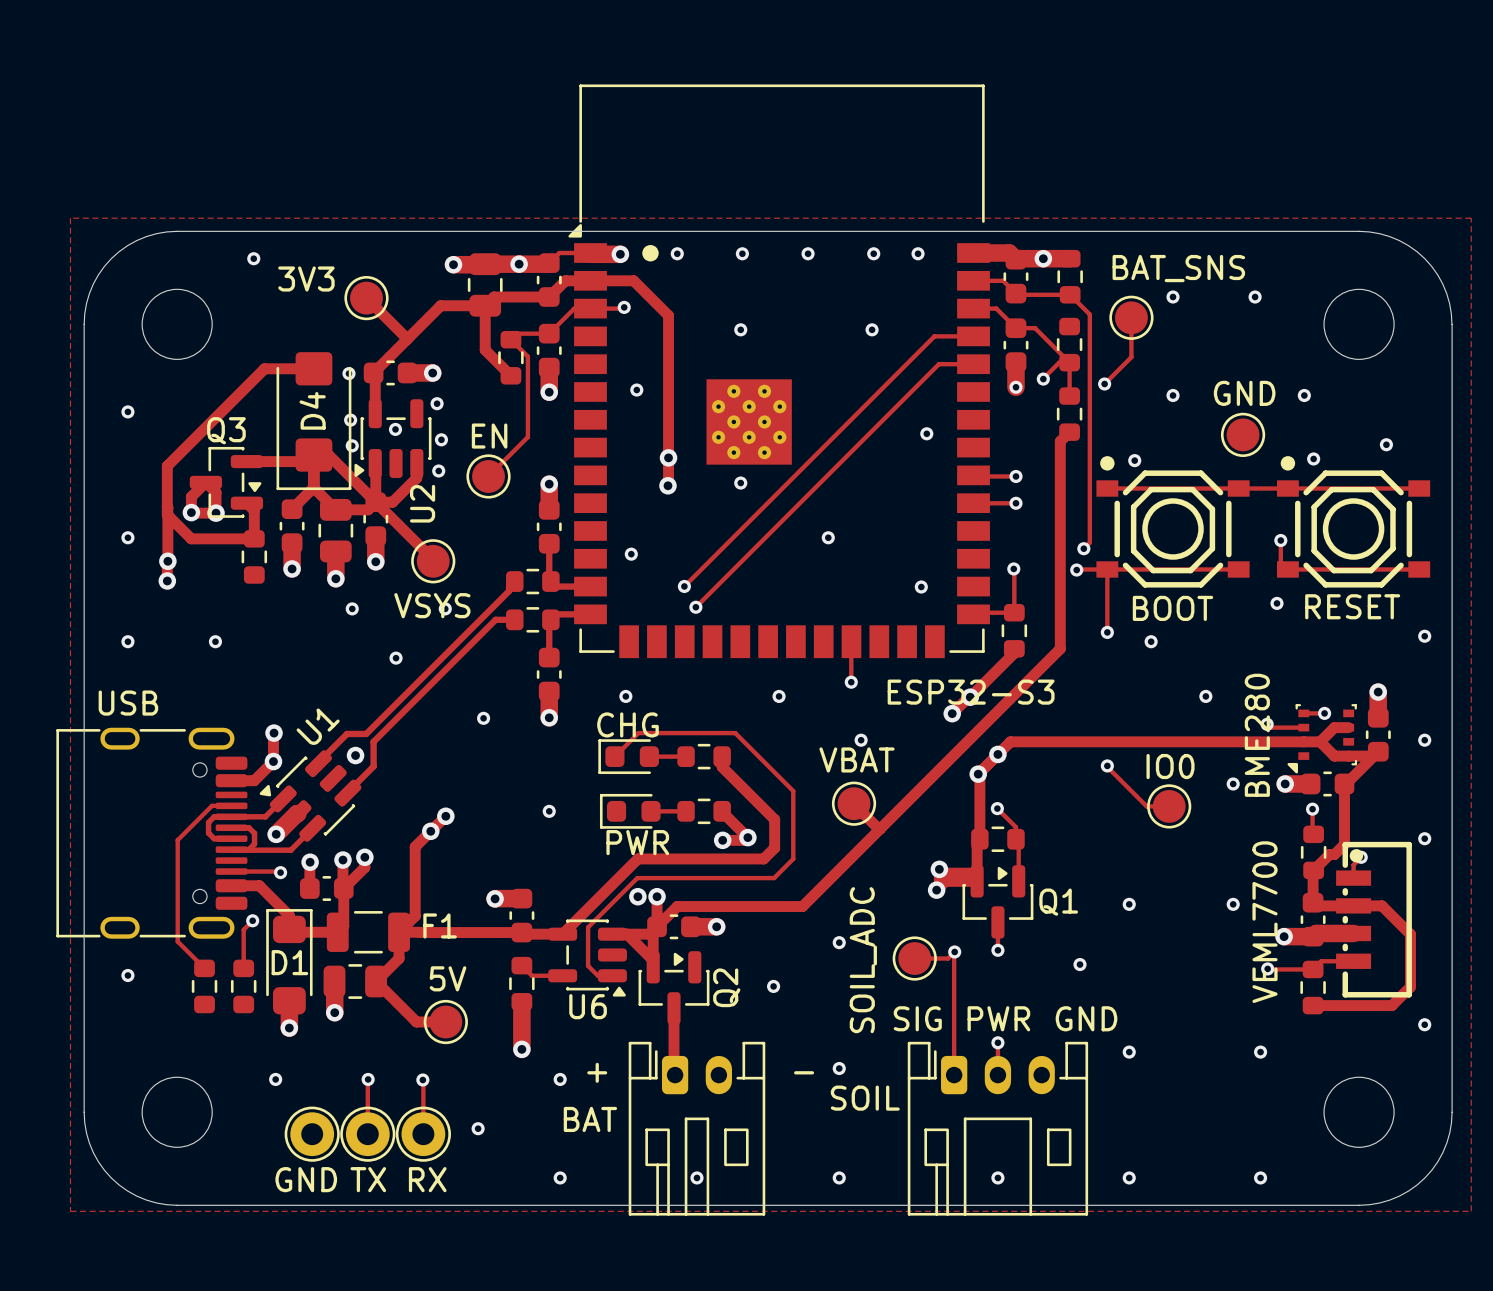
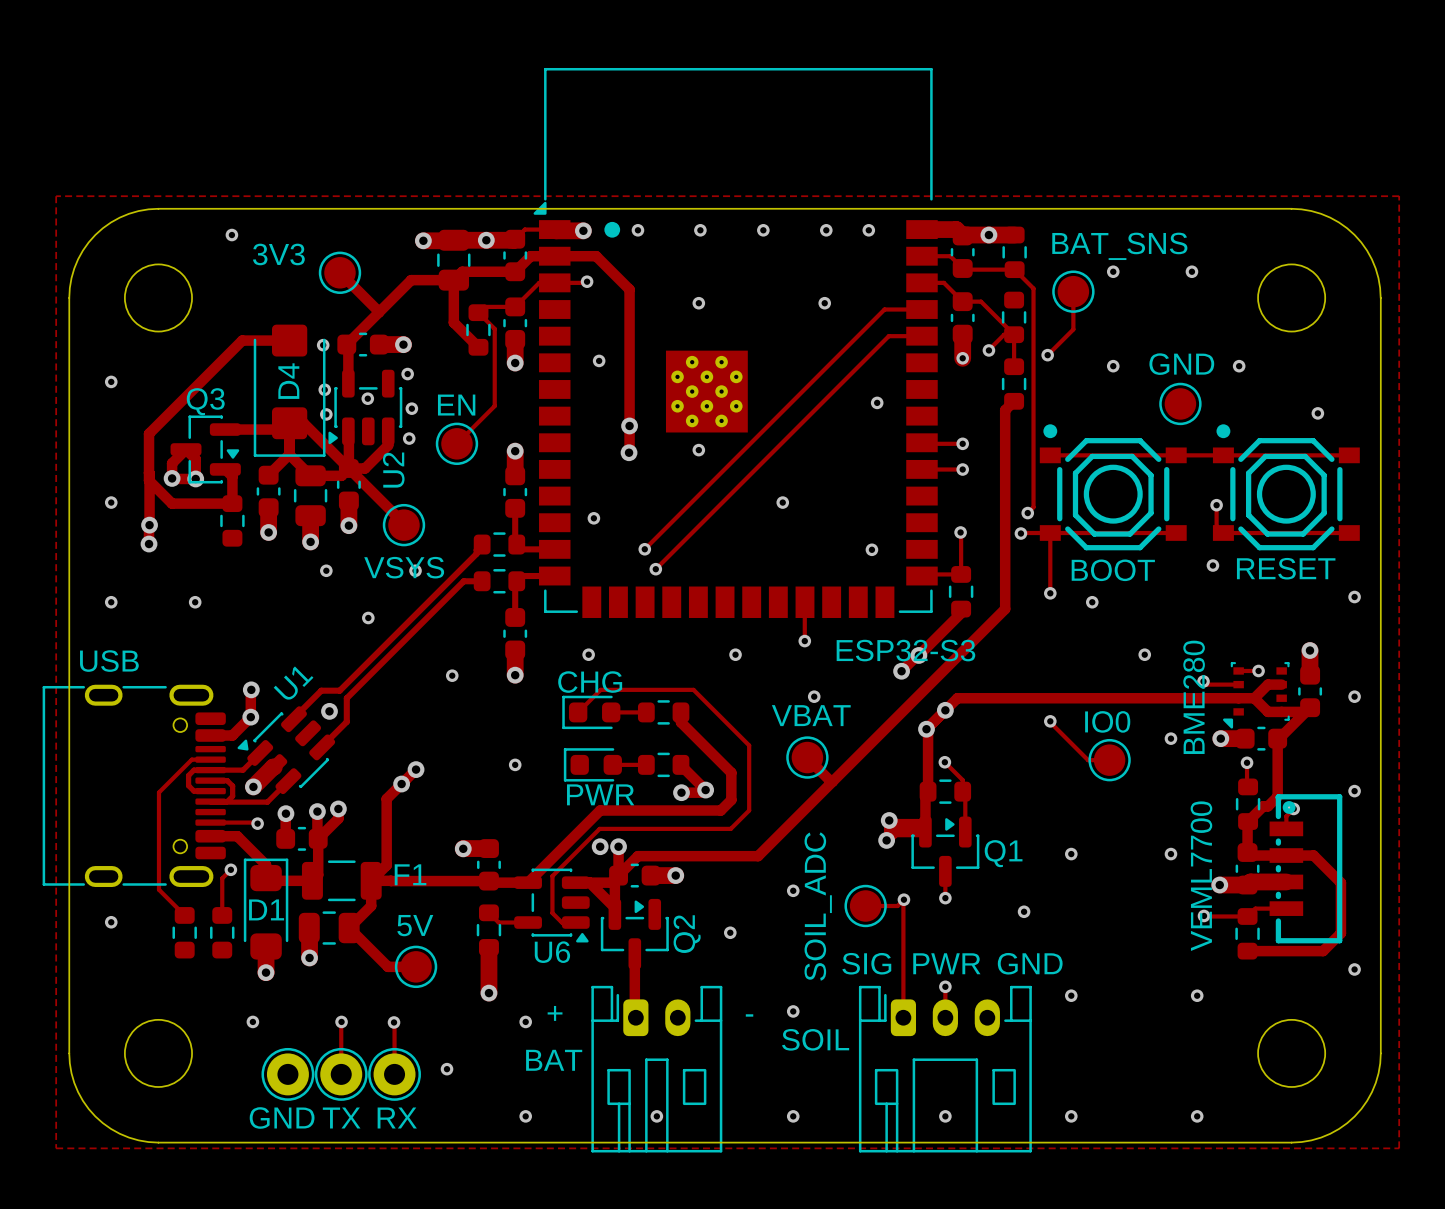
via: (1313, 458) -> none
via: (1134, 460) -> none

